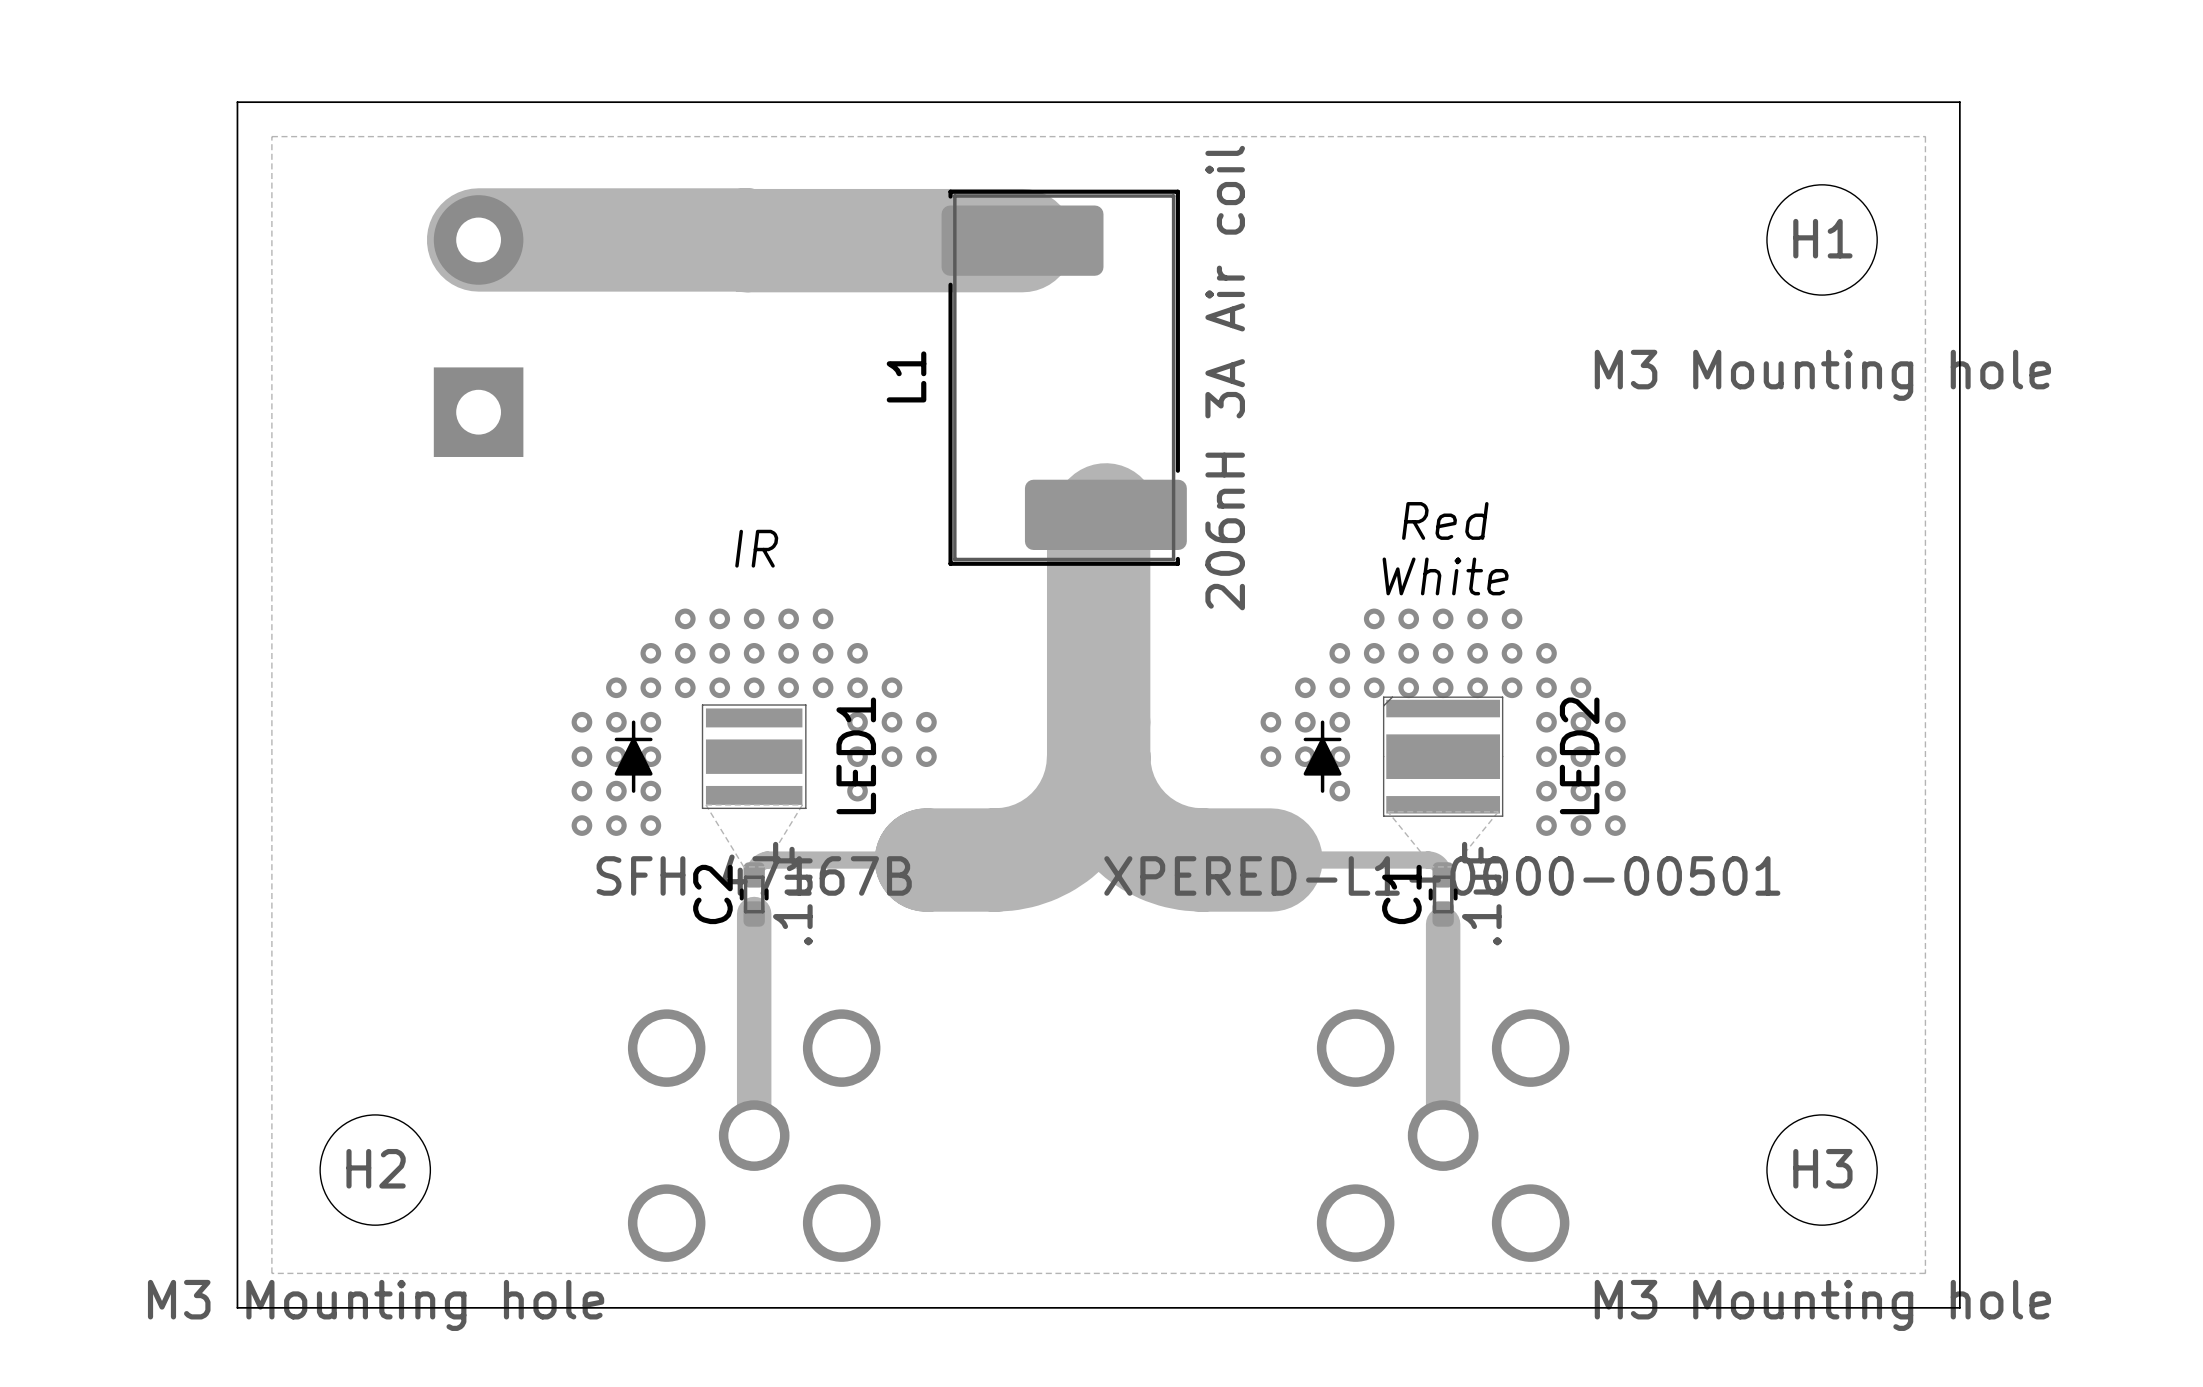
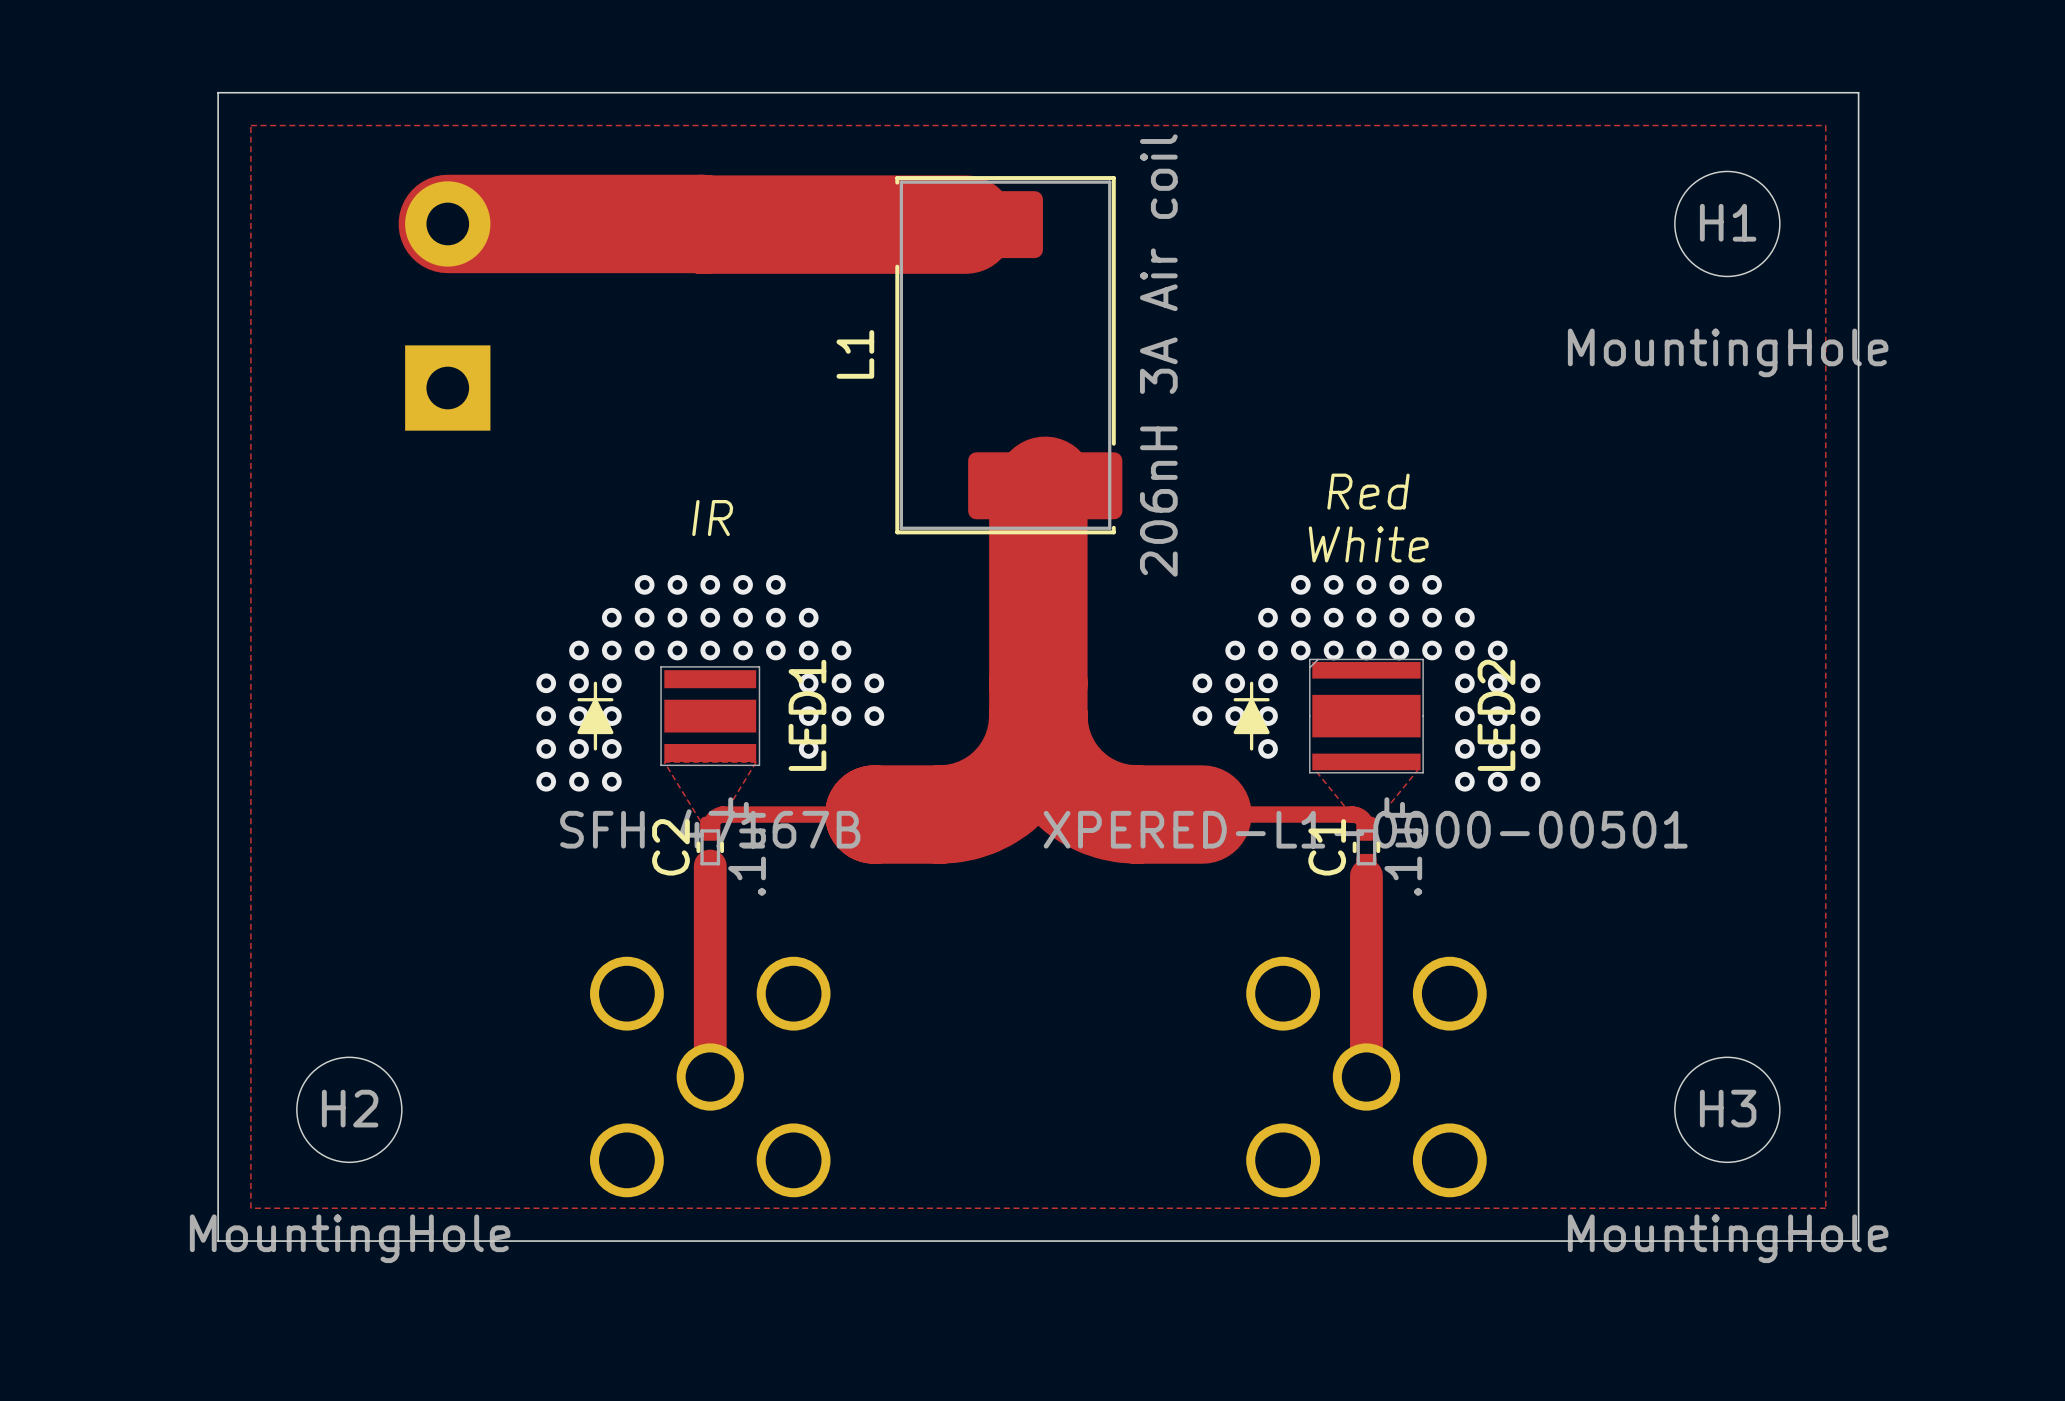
H1 value: M3 Mounting hole (1822, 375) -> MountingHole (1728, 352)
H2 value: M3 Mounting hole (376, 1305) -> MountingHole (350, 1238)
H3 value: M3 Mounting hole (1822, 1305) -> MountingHole (1728, 1238)

